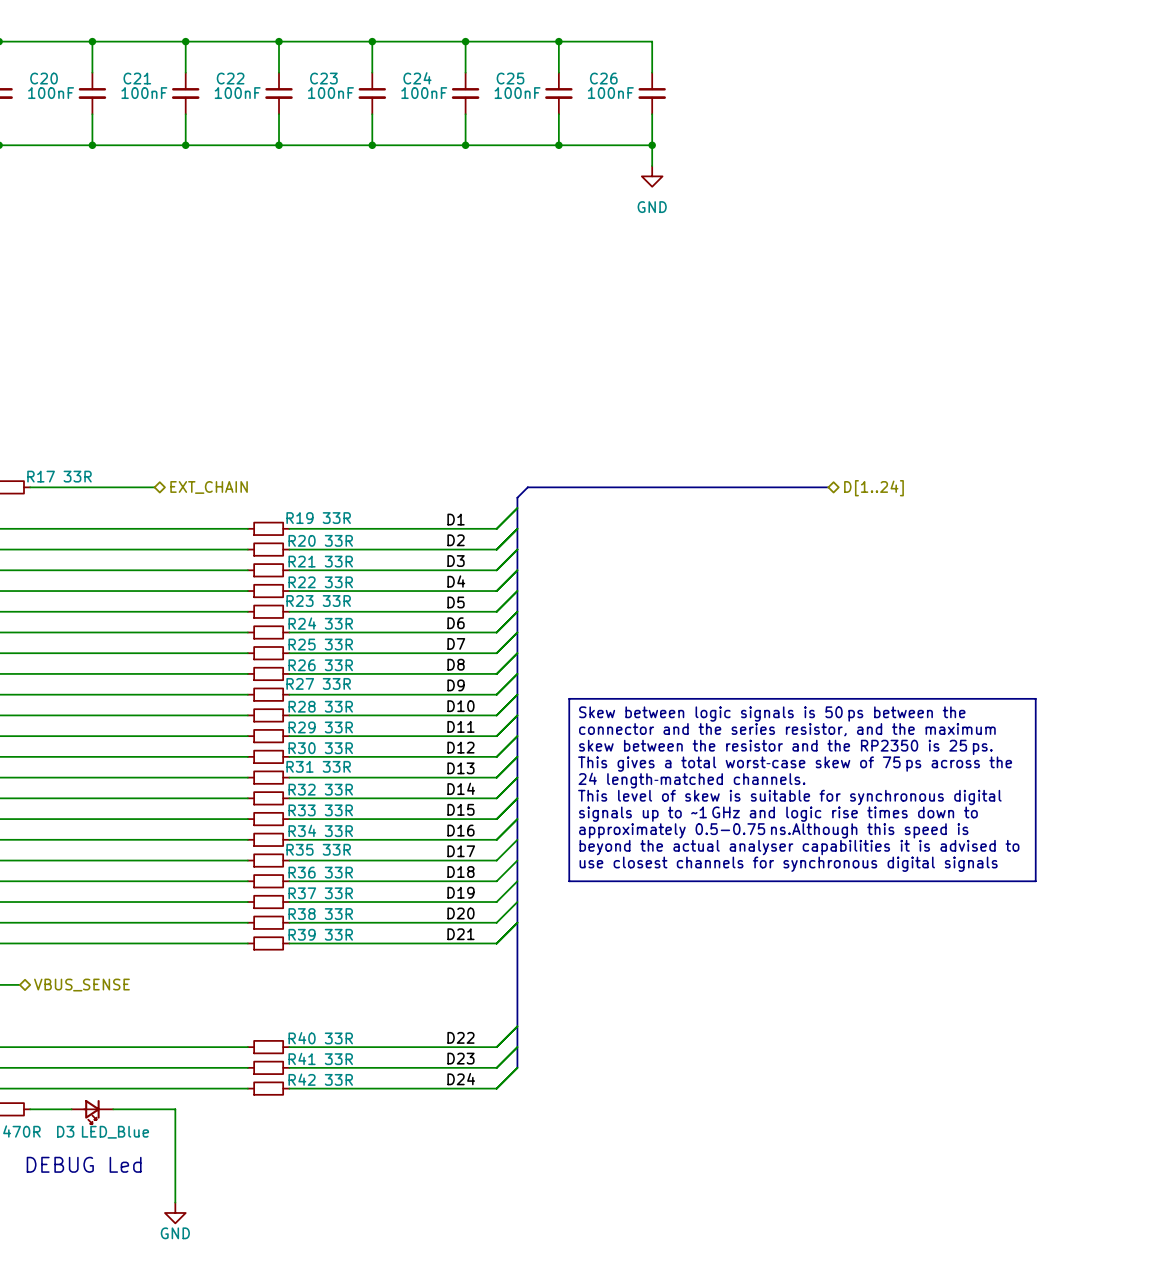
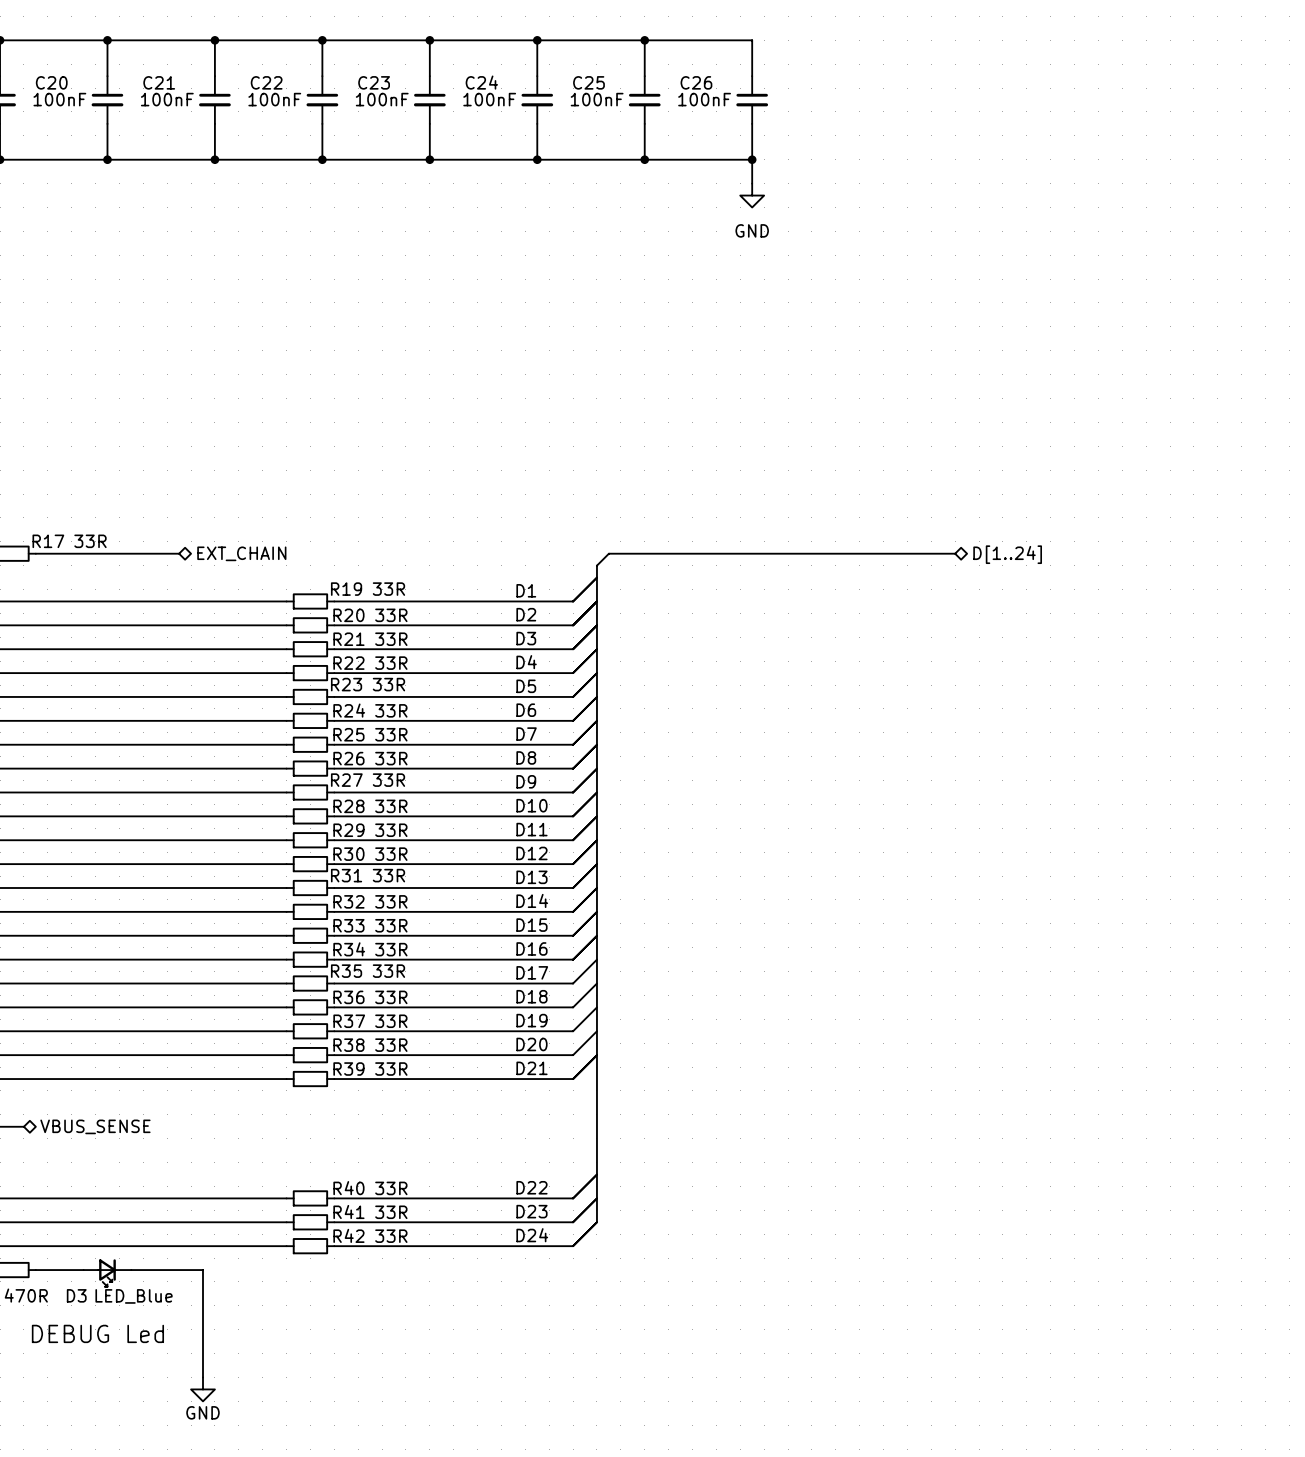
line: (569, 698) (1035, 698) (1035, 881) (569, 881) (569, 698) -> none
text: Skew between logic signals is 50 ps between the (772, 714) -> none
text: connector and the series resistor, and the maximum (787, 729) -> none
text: skew between the resistor and the RP2350 is 25 ps. (785, 747) -> none
text: This gives a total worst‑case skew of 75 ps across the (795, 764) -> none
text: 24 length‑matched channels. (691, 780) -> none
text: This level of skew is suitable for synchronous digital (789, 797) -> none
text: signals up to ~1 GHz and logic rise times down to (778, 814) -> none
text: approximately 0.5-0.75 ns.Although this speed is (773, 830) -> none
text: beyond the actual analyser capabilities it is advised to (799, 847) -> none
text: use closest channels for synchronous digital signals (788, 864) -> none

